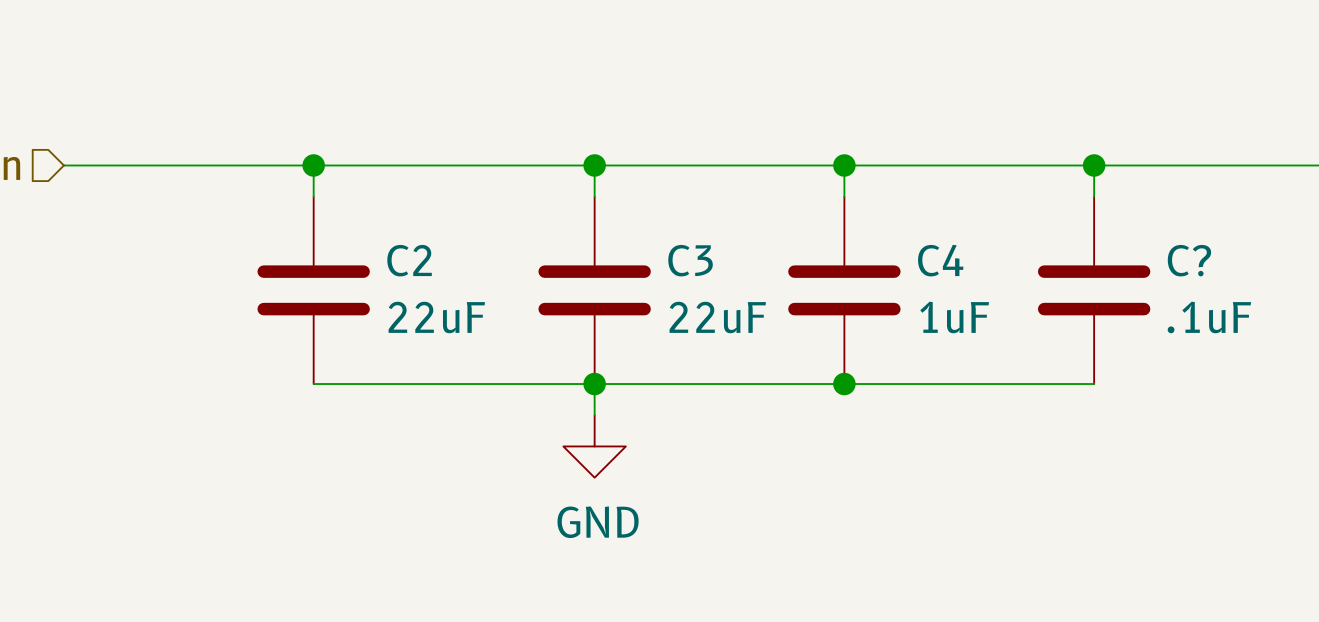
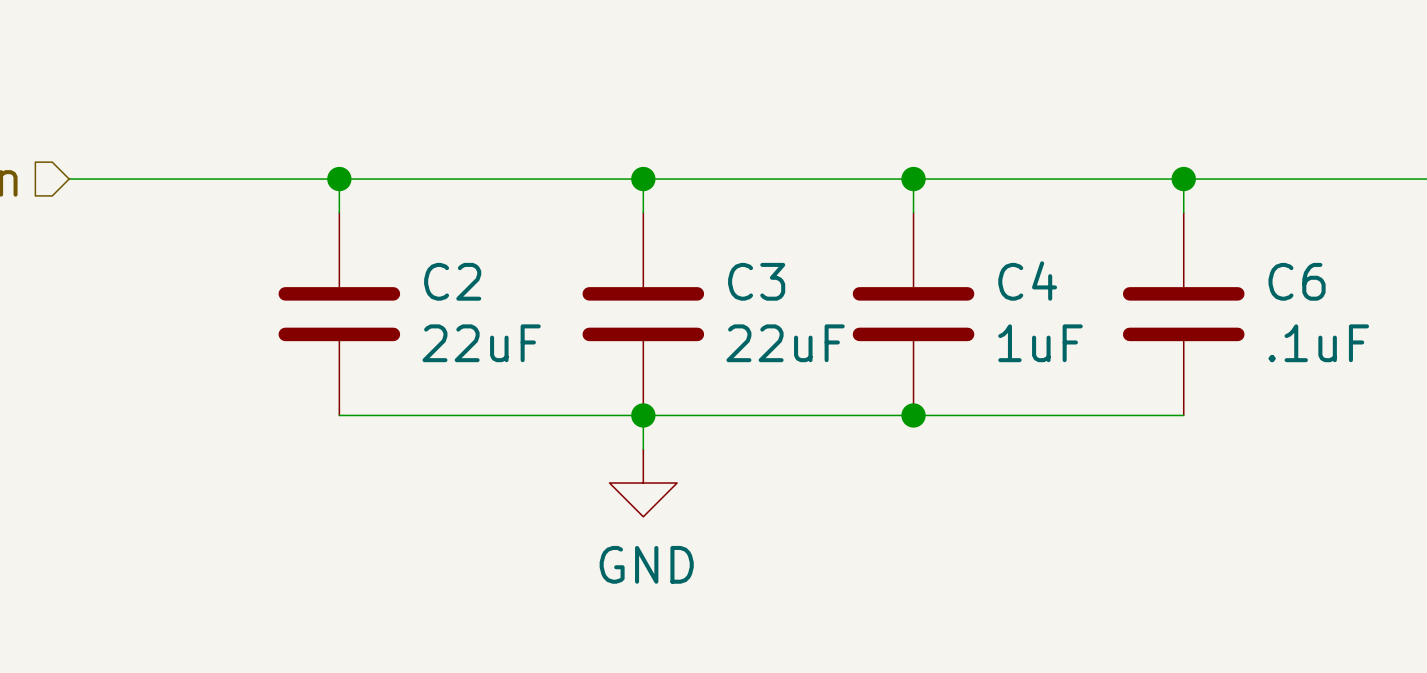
C? name: C? (1189, 260) -> C6 (1297, 281)

